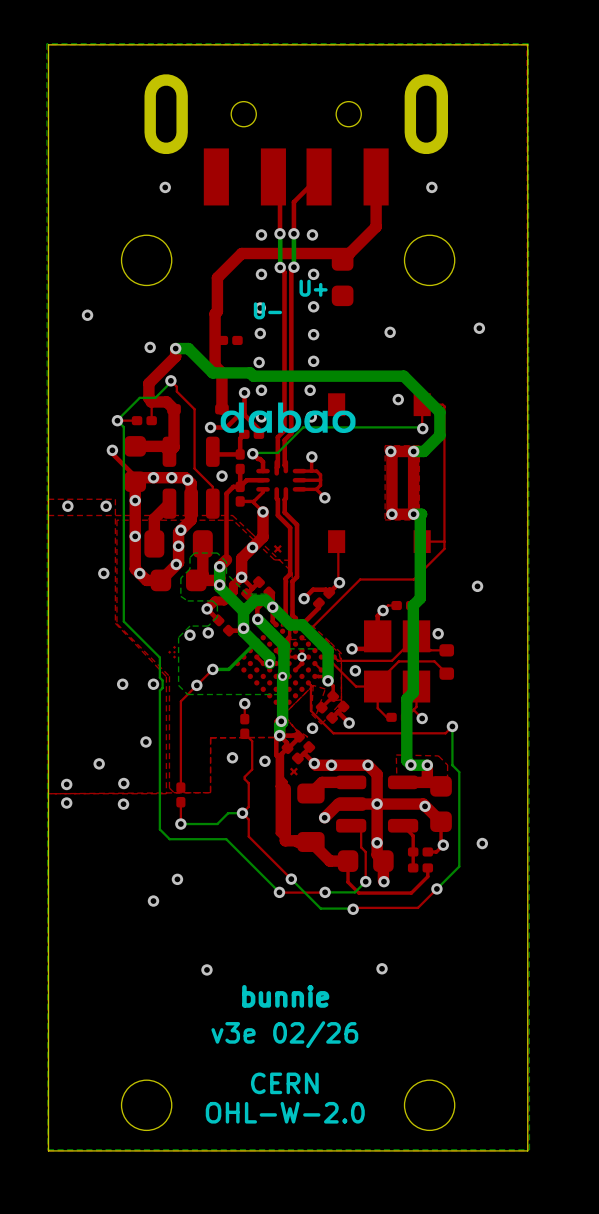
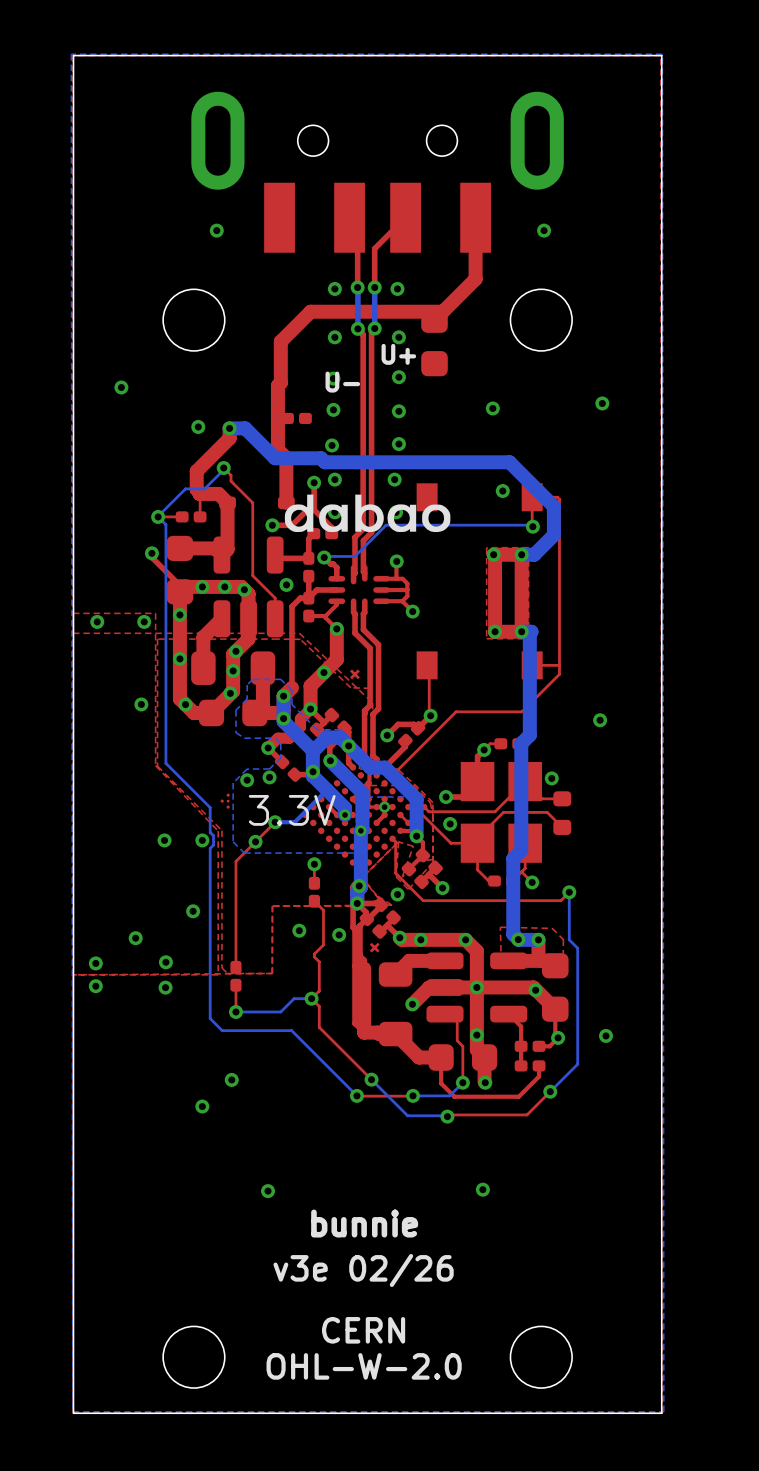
text: none -> 3.3V (292, 810)

